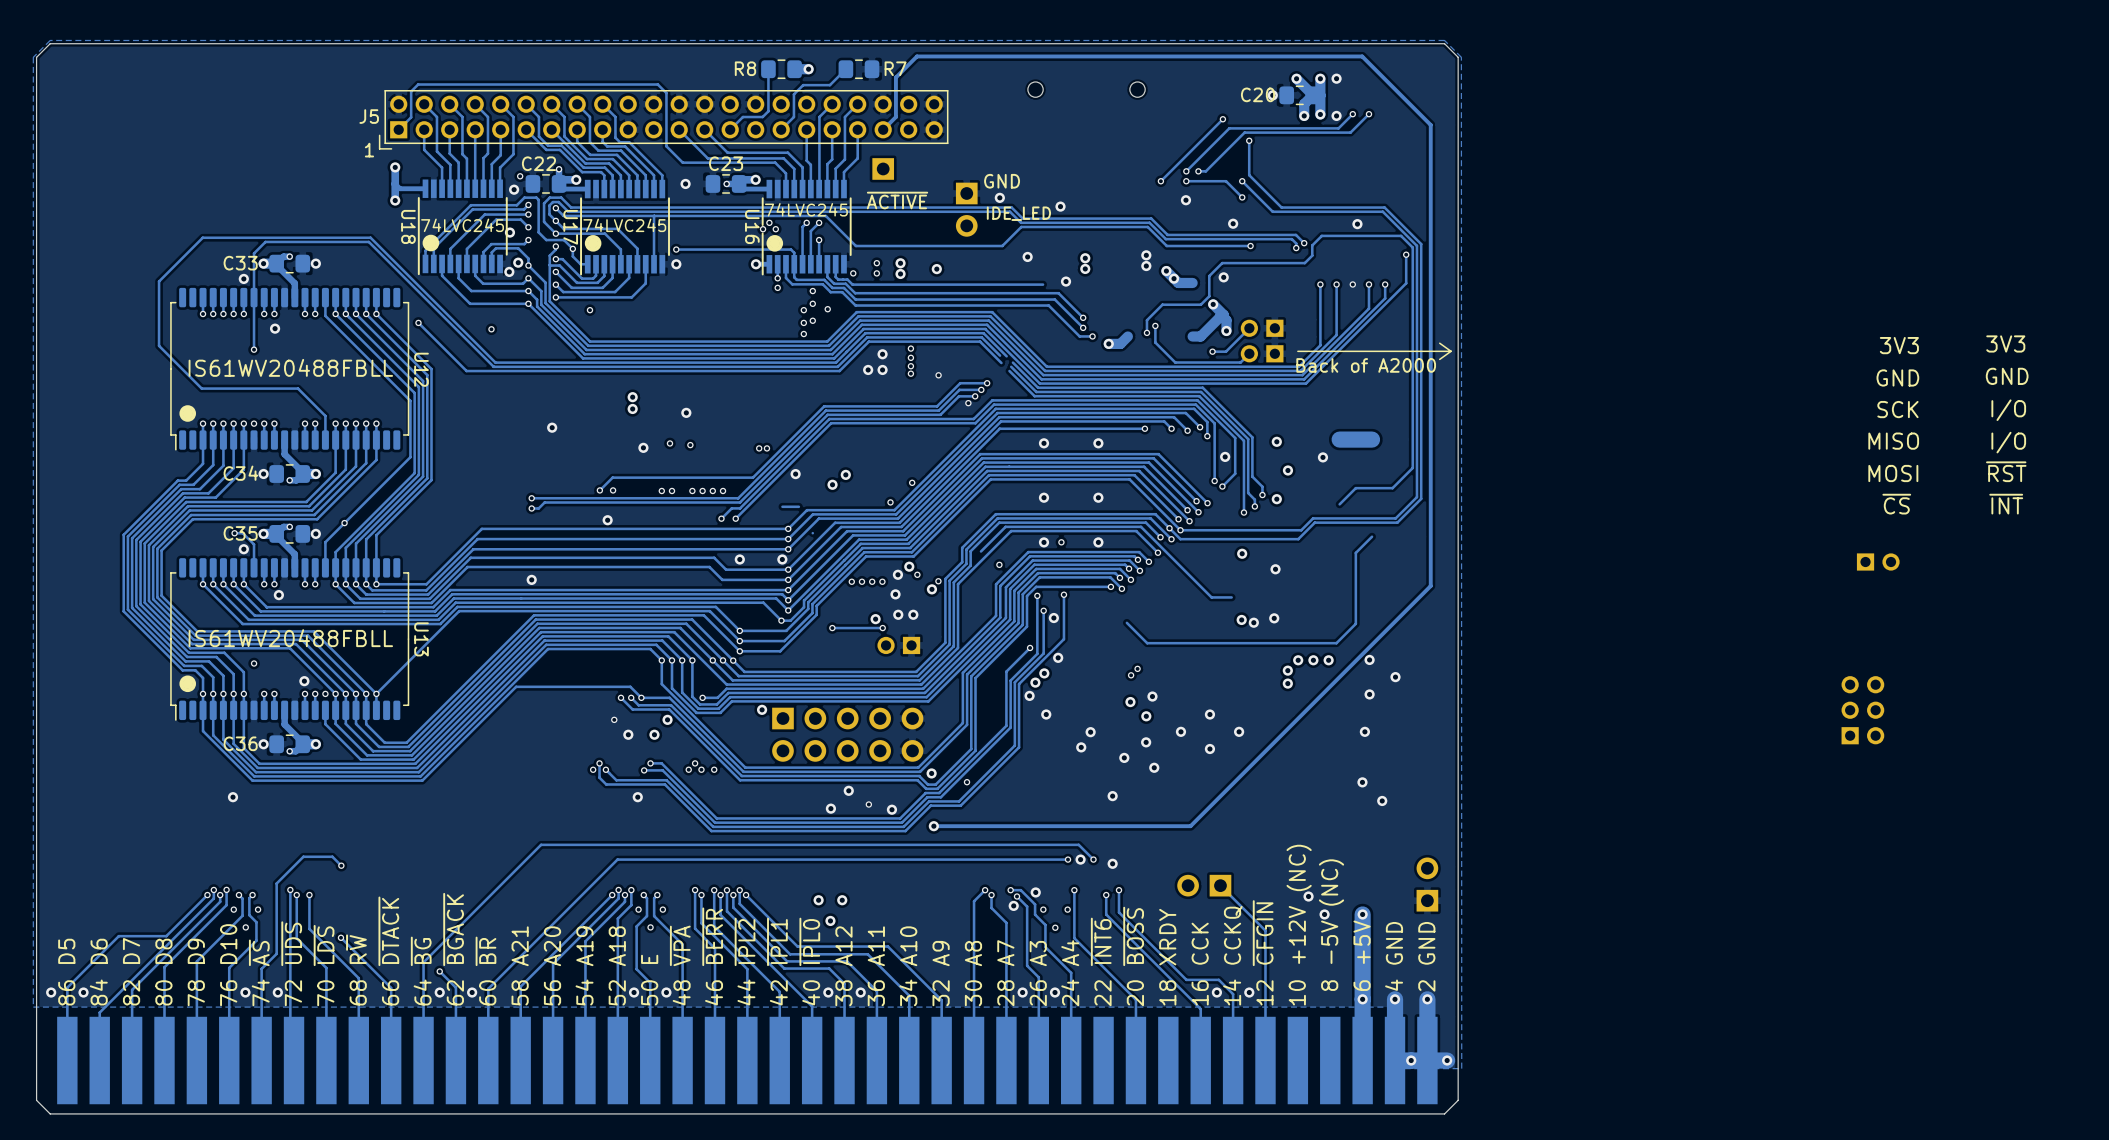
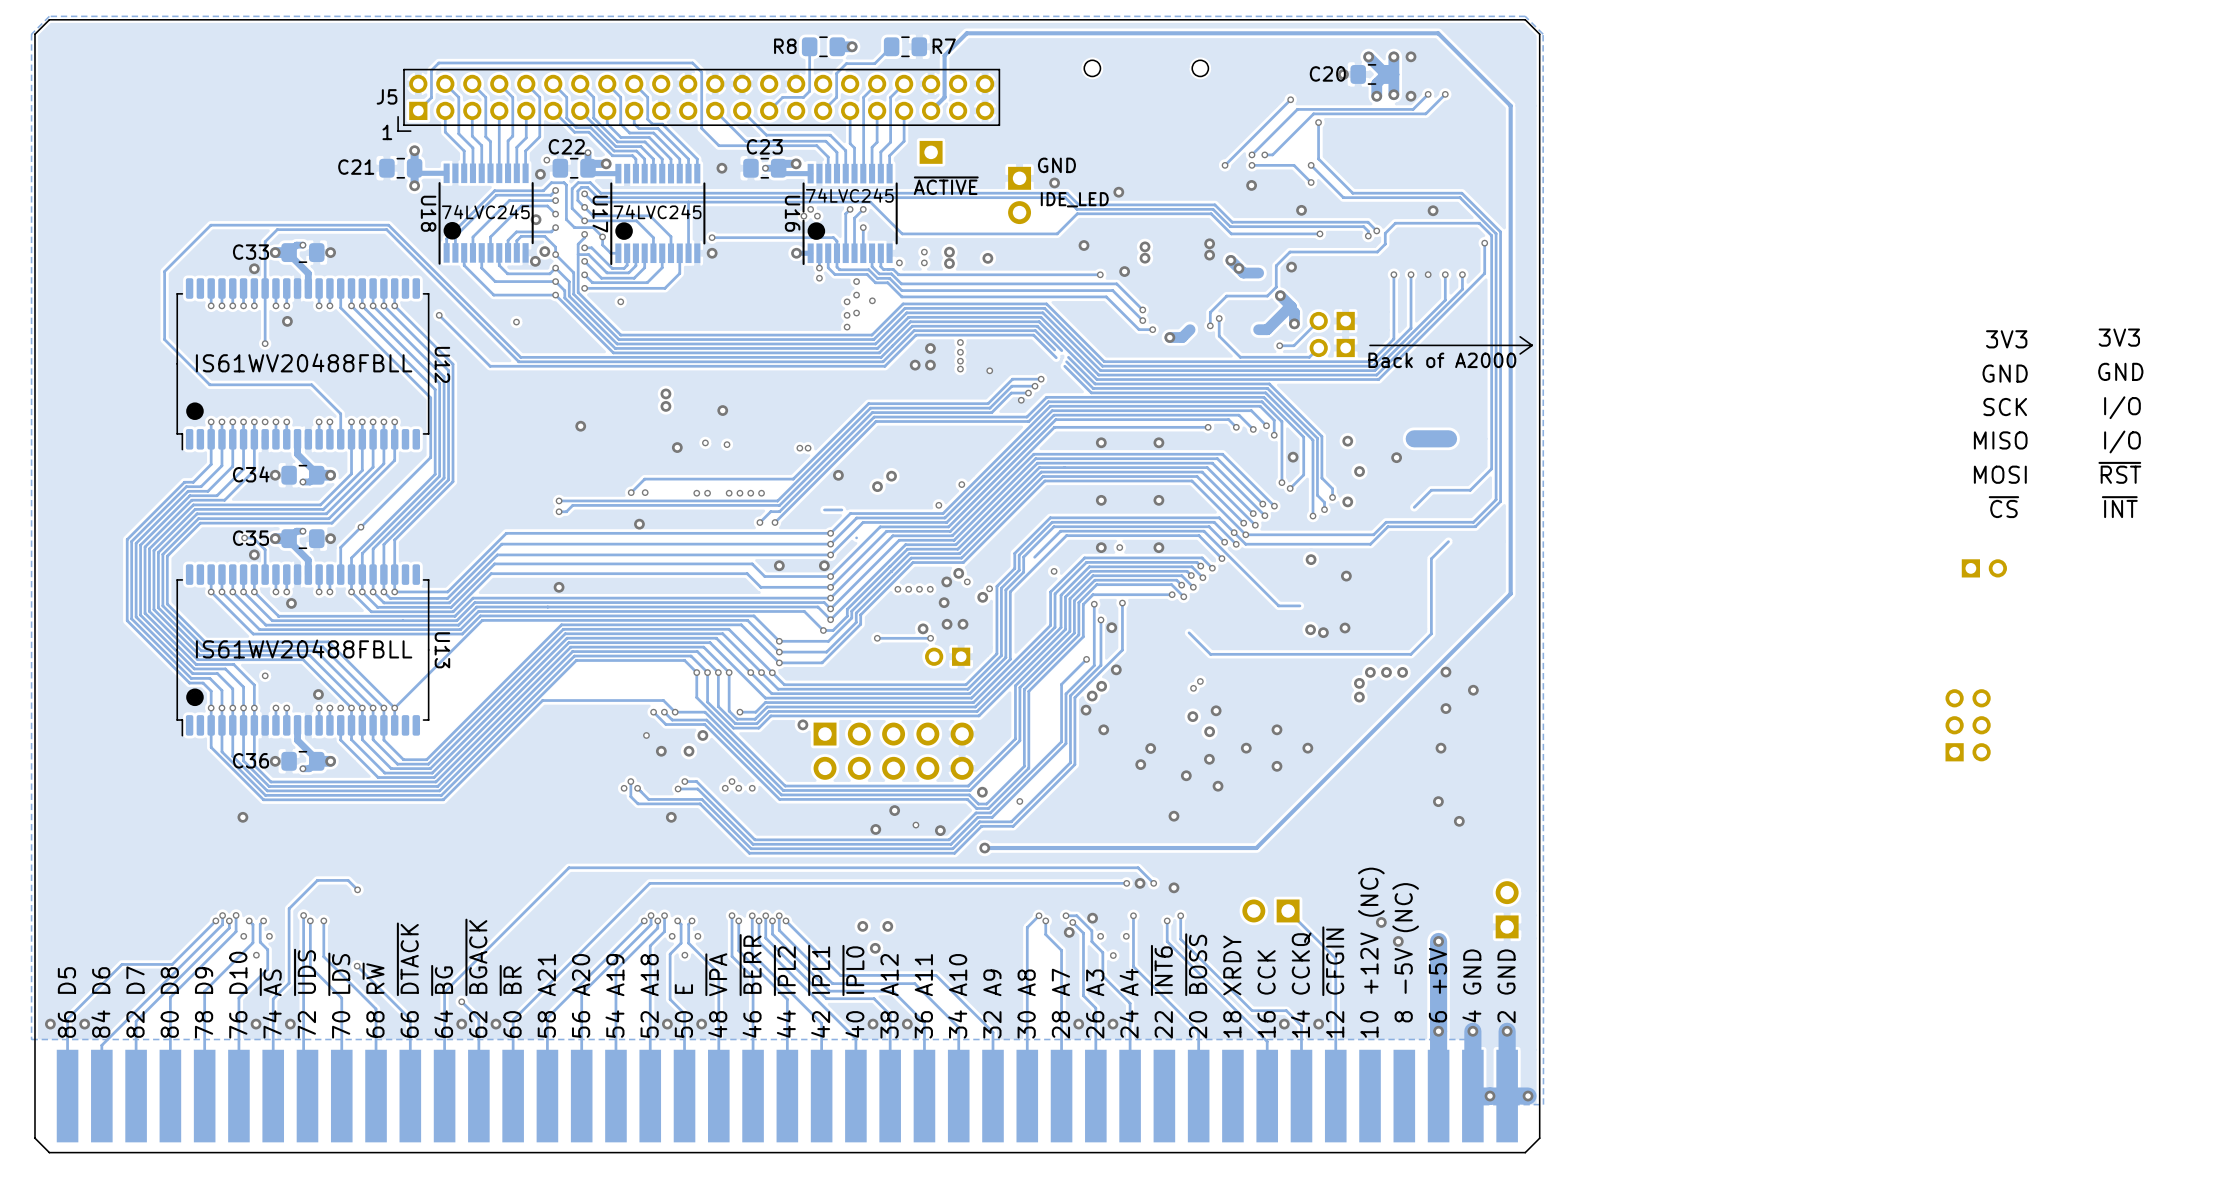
C21: none -> (400, 168)
via: none -> (1100, 274)

